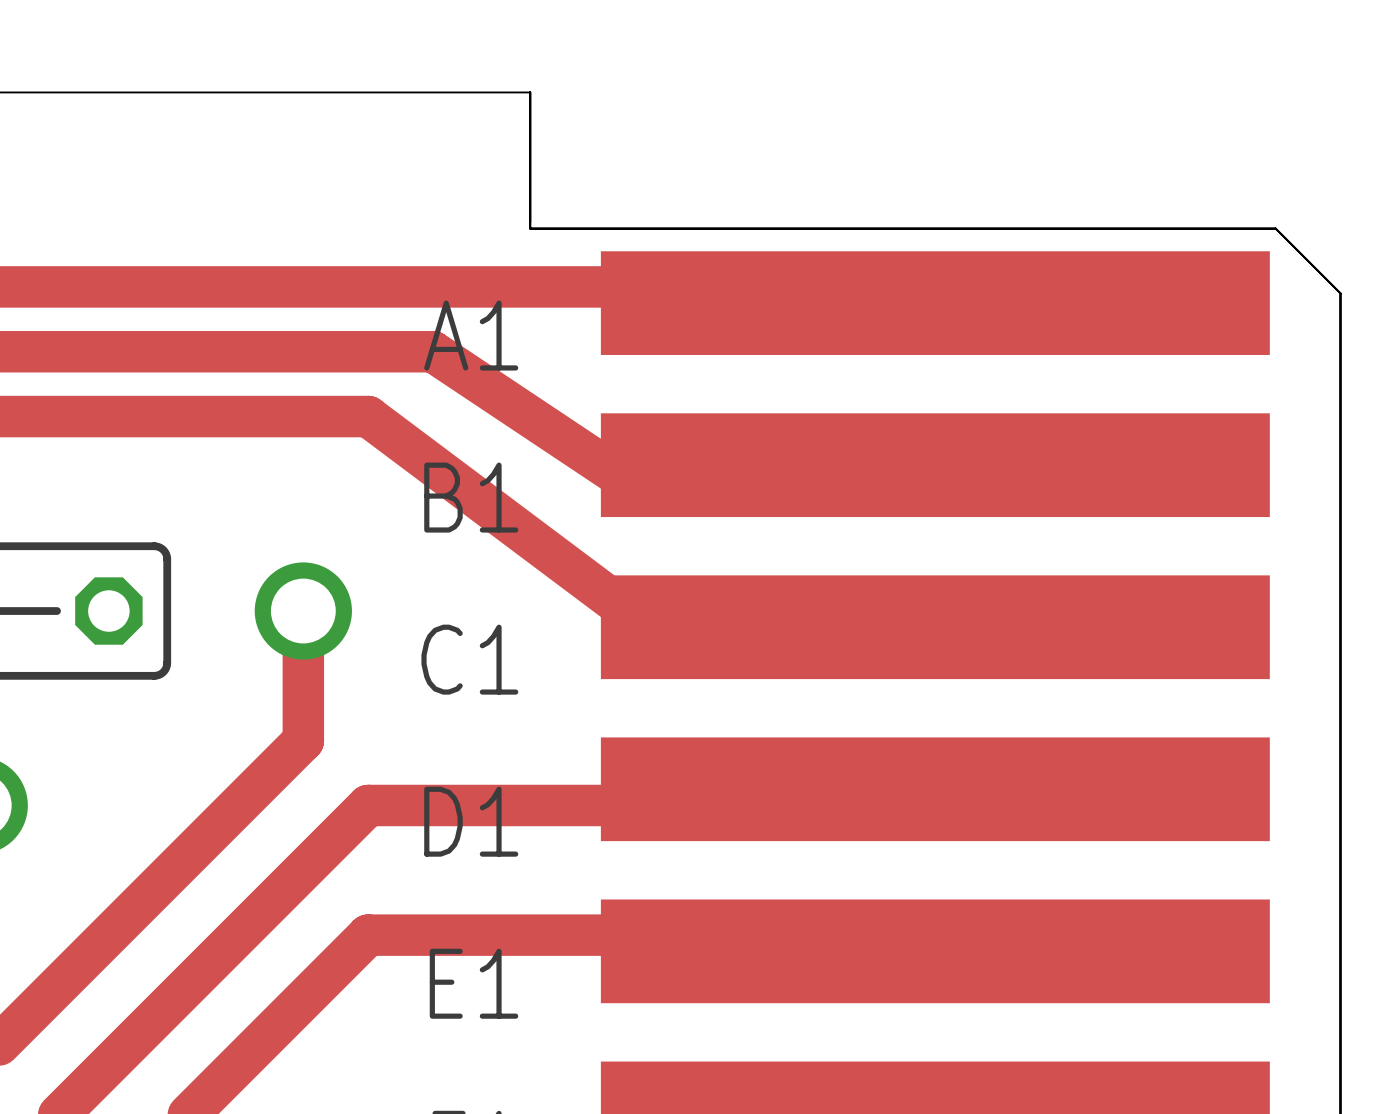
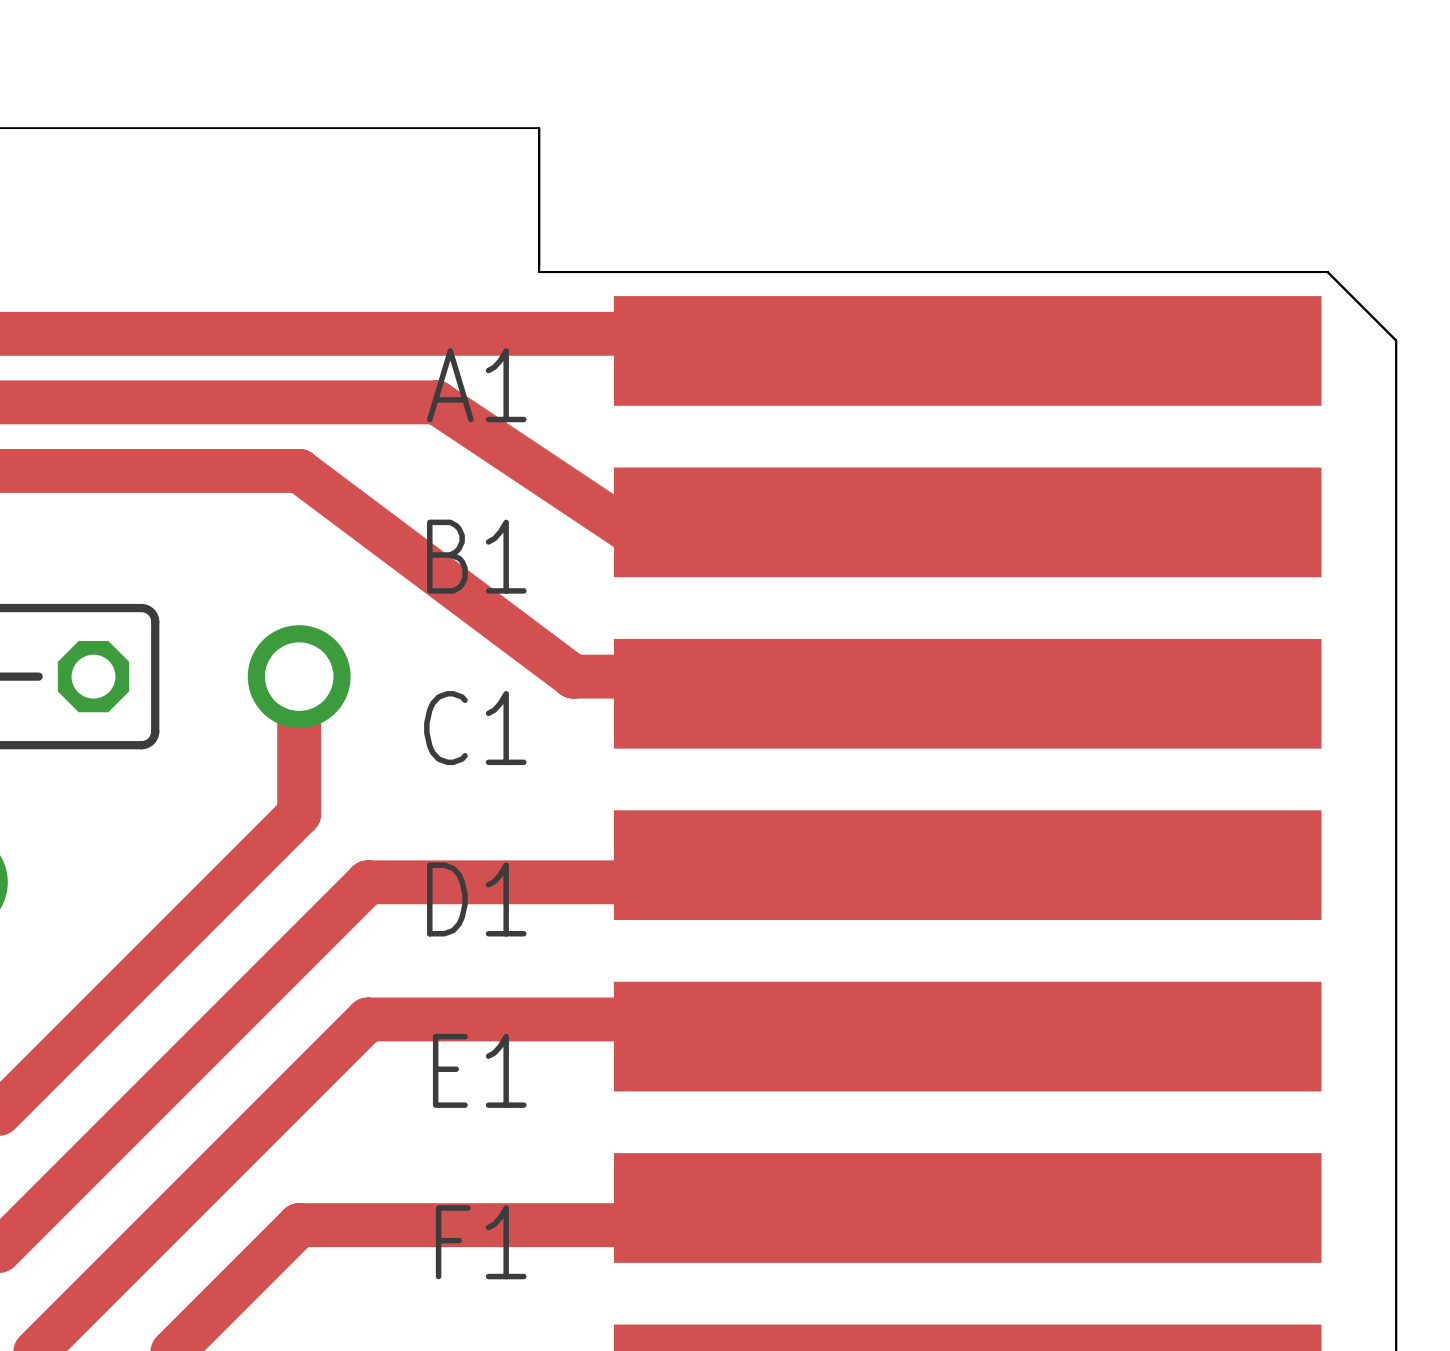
track: (303, 416) (368, 416) (627, 611) -> (299, 470) (573, 676) (642, 676)

